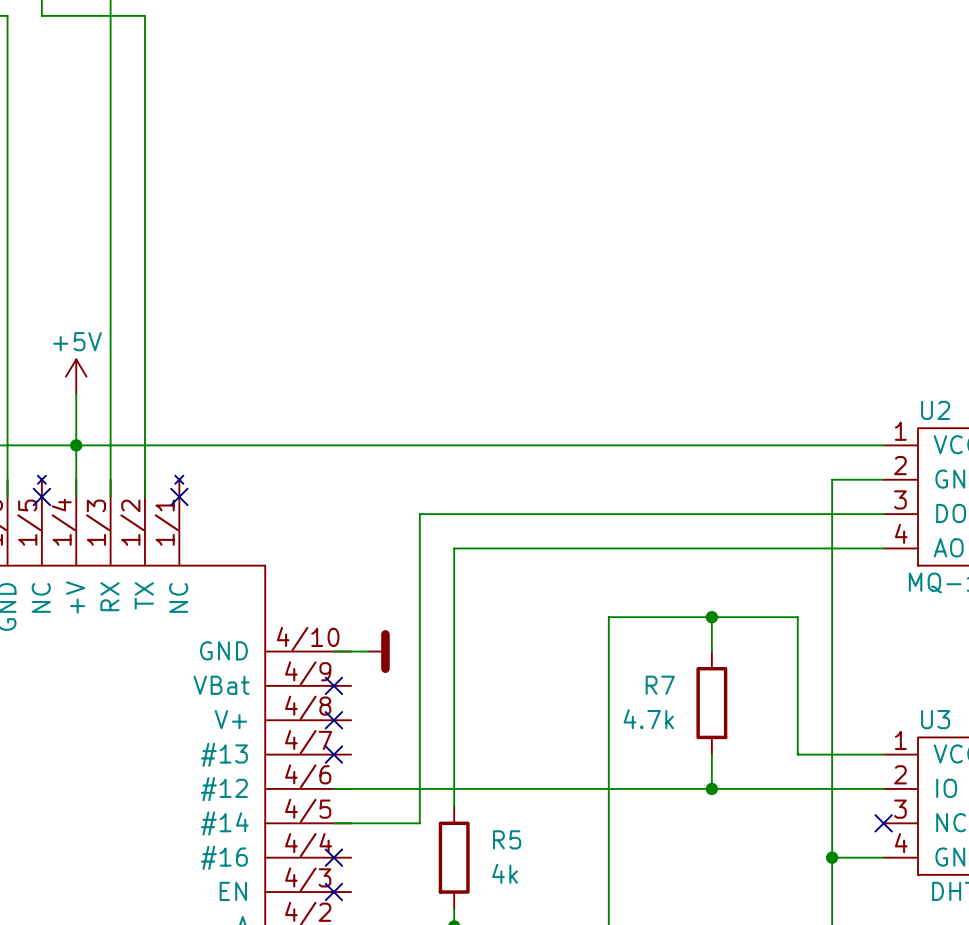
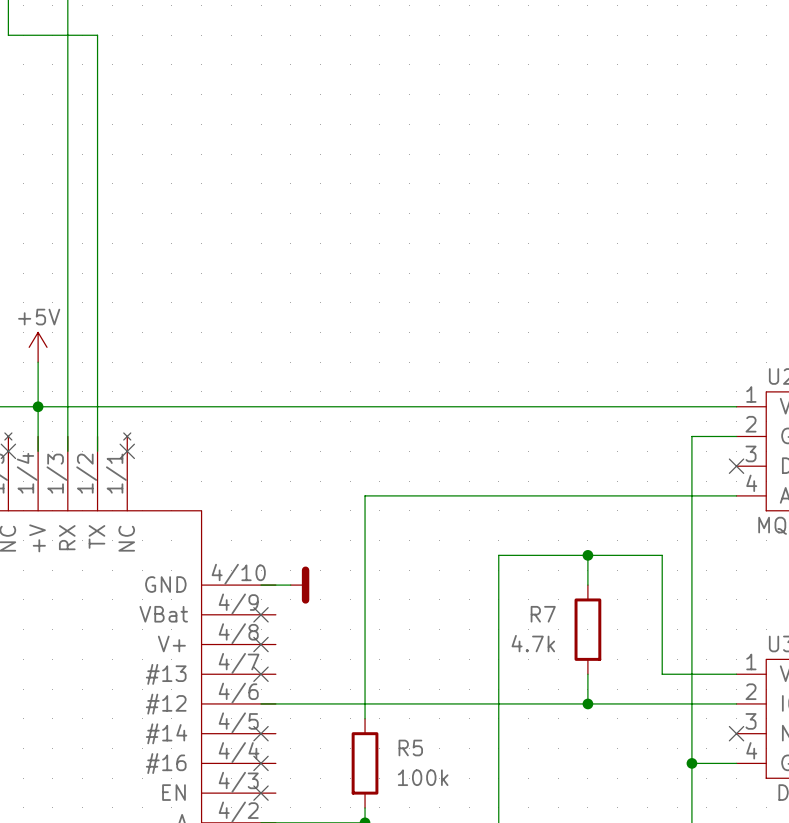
wire: (883, 514) (419, 514) (419, 823) (333, 823) -> none
no-connect mark: none -> (736, 466)
no-connect mark: none -> (261, 733)
R5 value: 4k (505, 873) -> 100k (423, 777)

